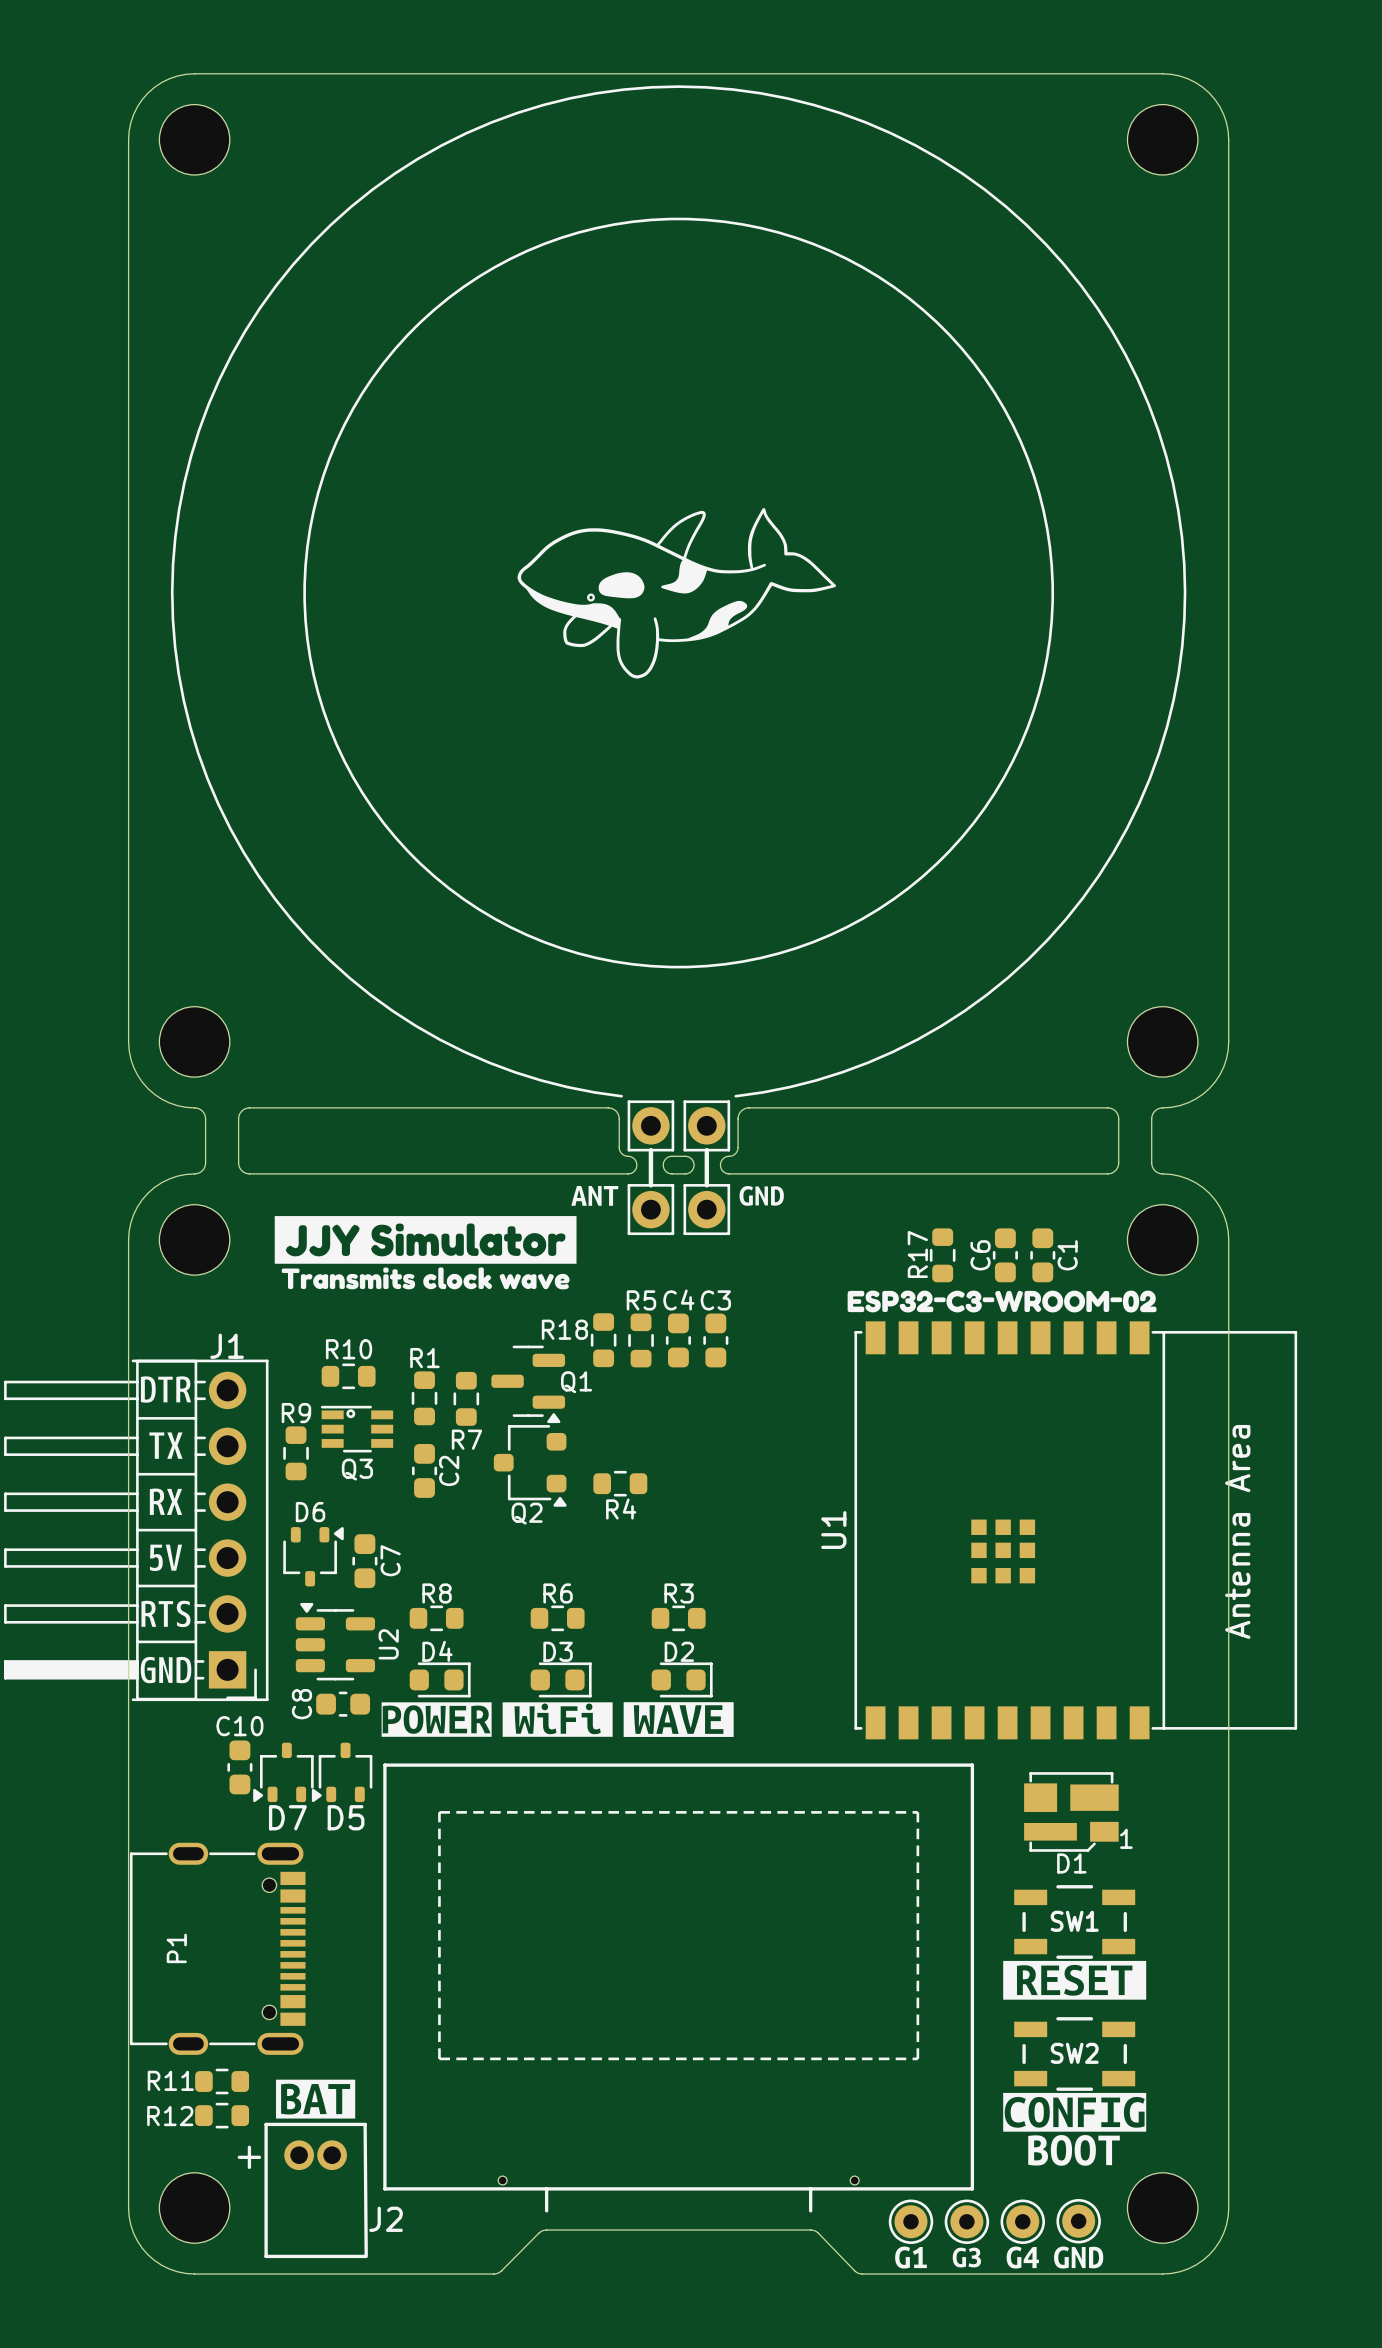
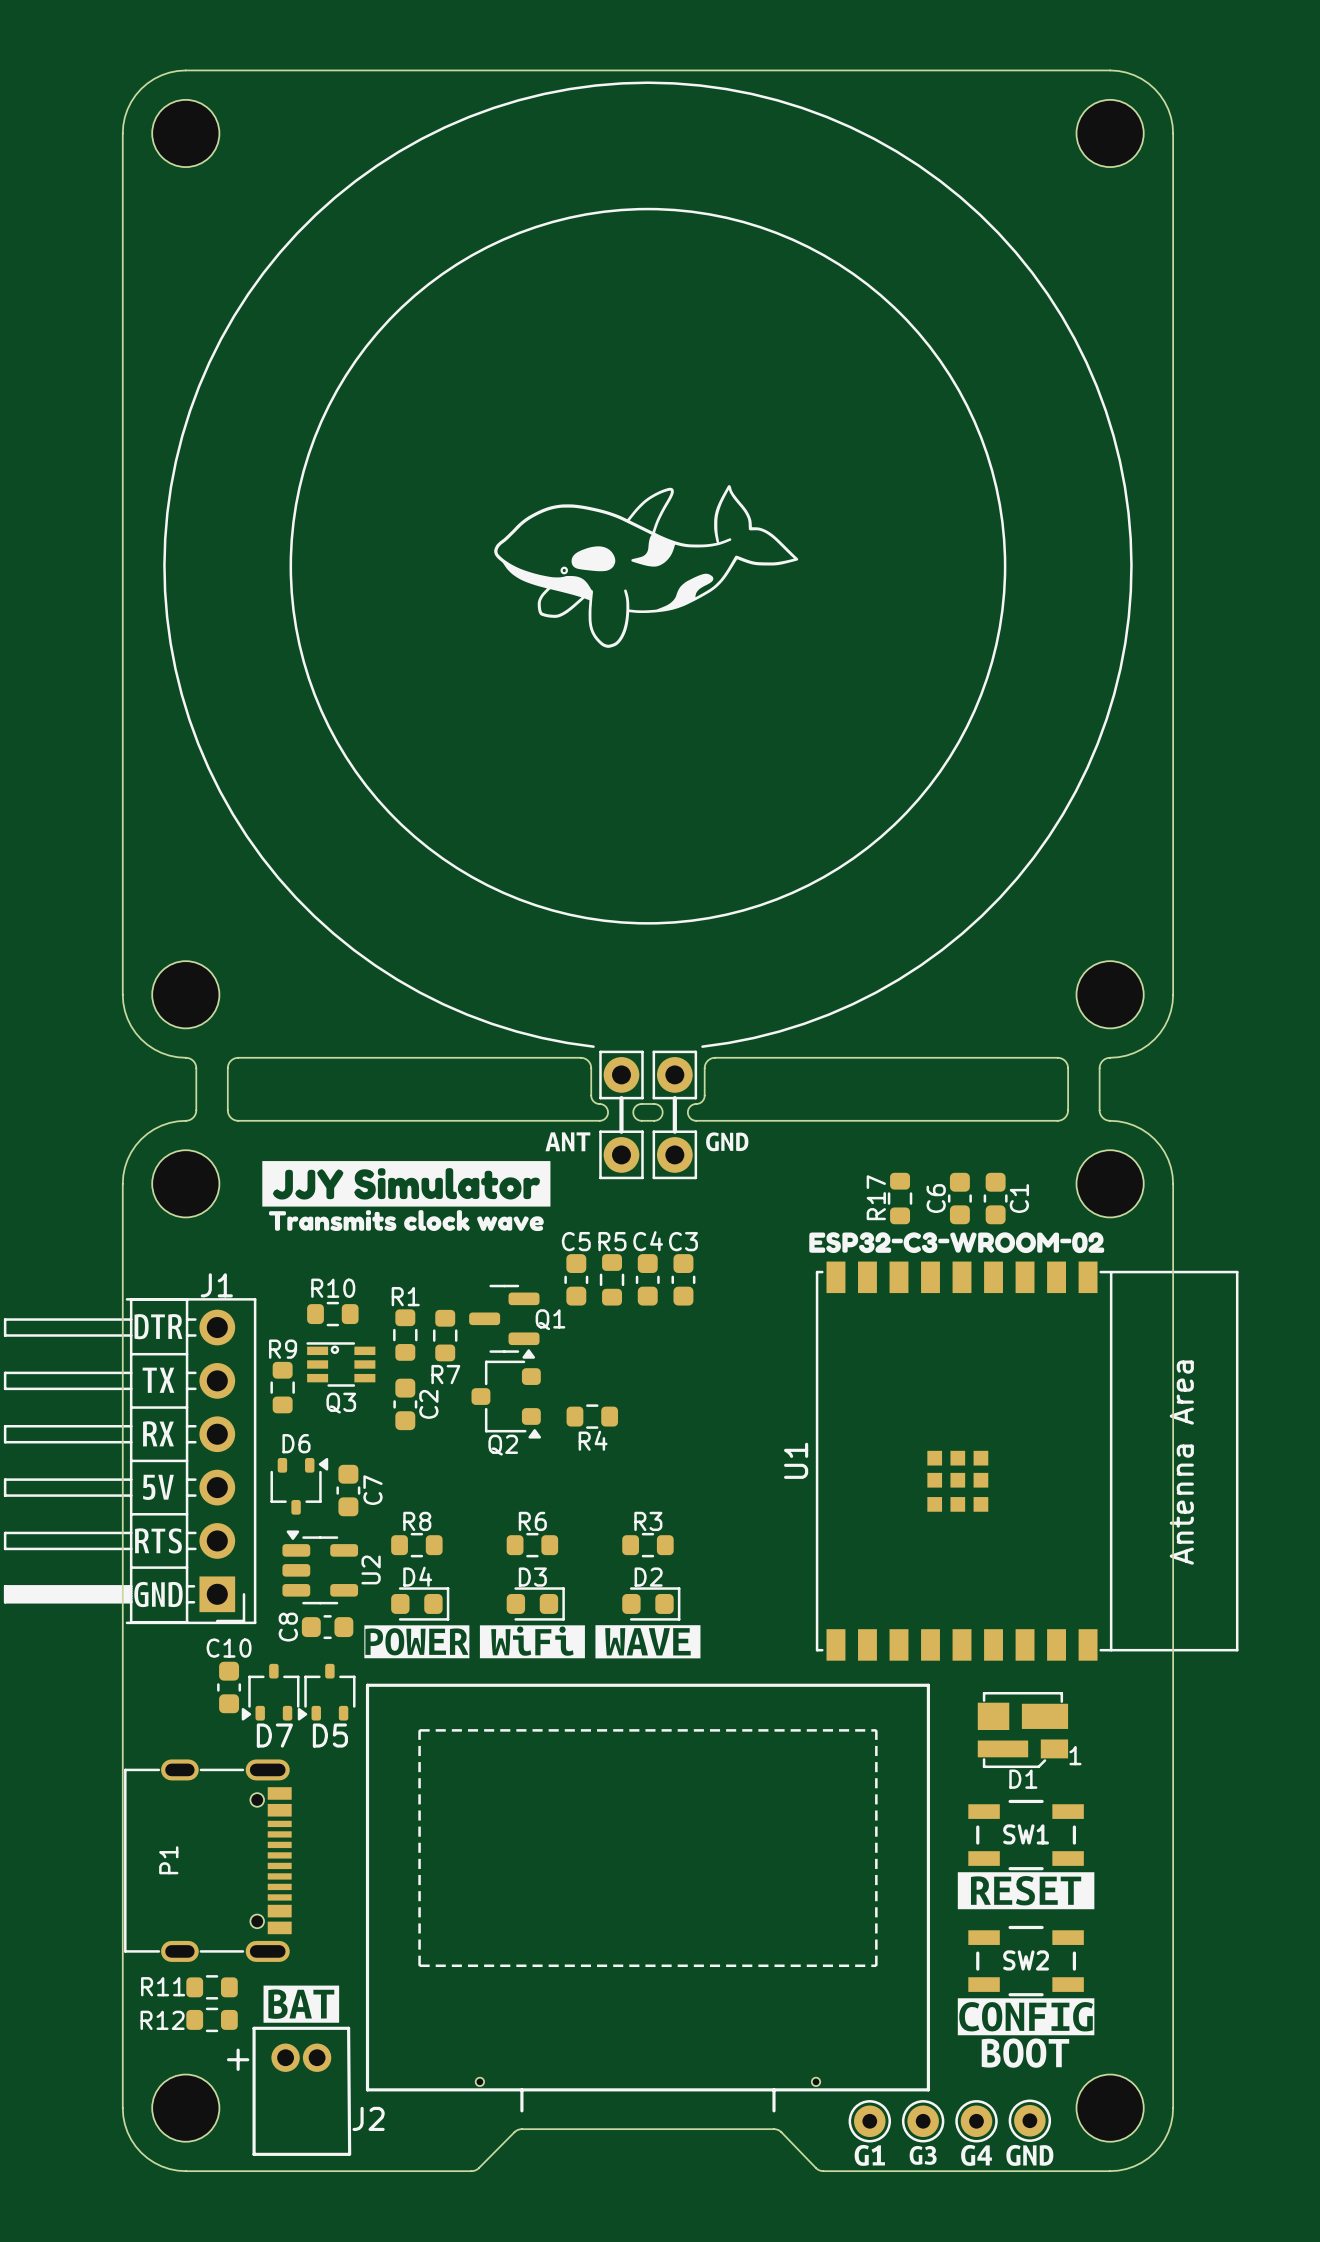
R18: (603, 1340) -> none
C5: none -> (576, 1279)

